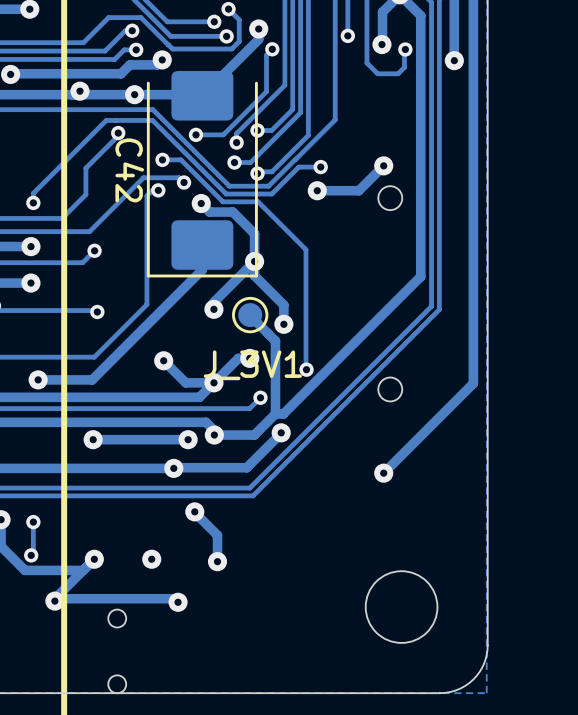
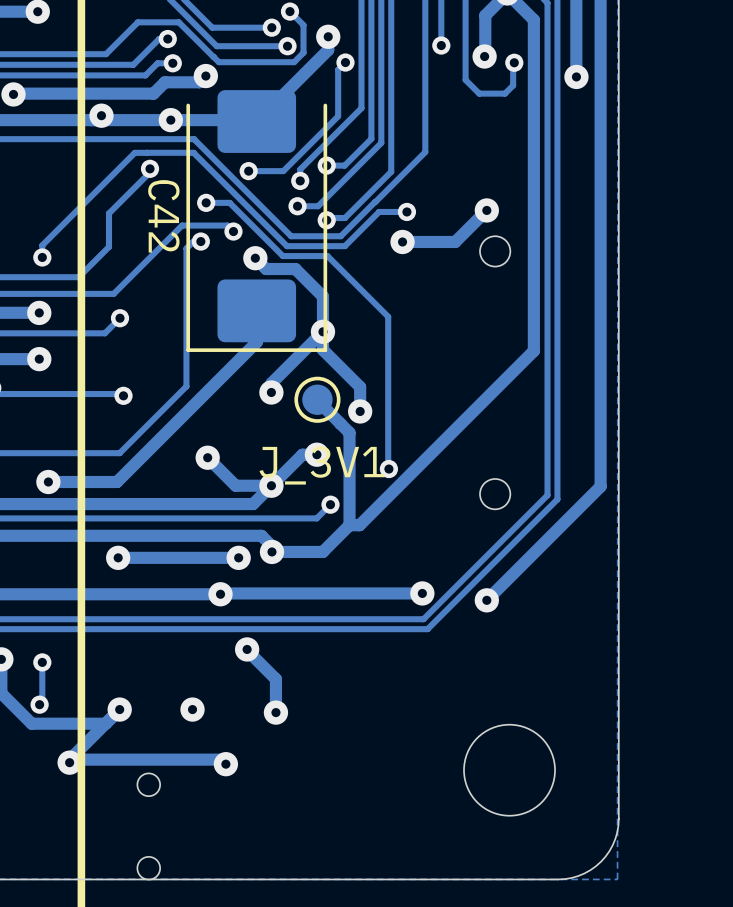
track: (431, 306) (249, 488) -> (547, 388) (547, 495) (423, 619) (316, 619)
track: (439, 309) (253, 495) -> (557, 392) (557, 499) (427, 629) (321, 629)
track: (281, 432) (246, 467) -> (422, 593) (313, 593)
via position: (281, 432) -> (422, 593)

